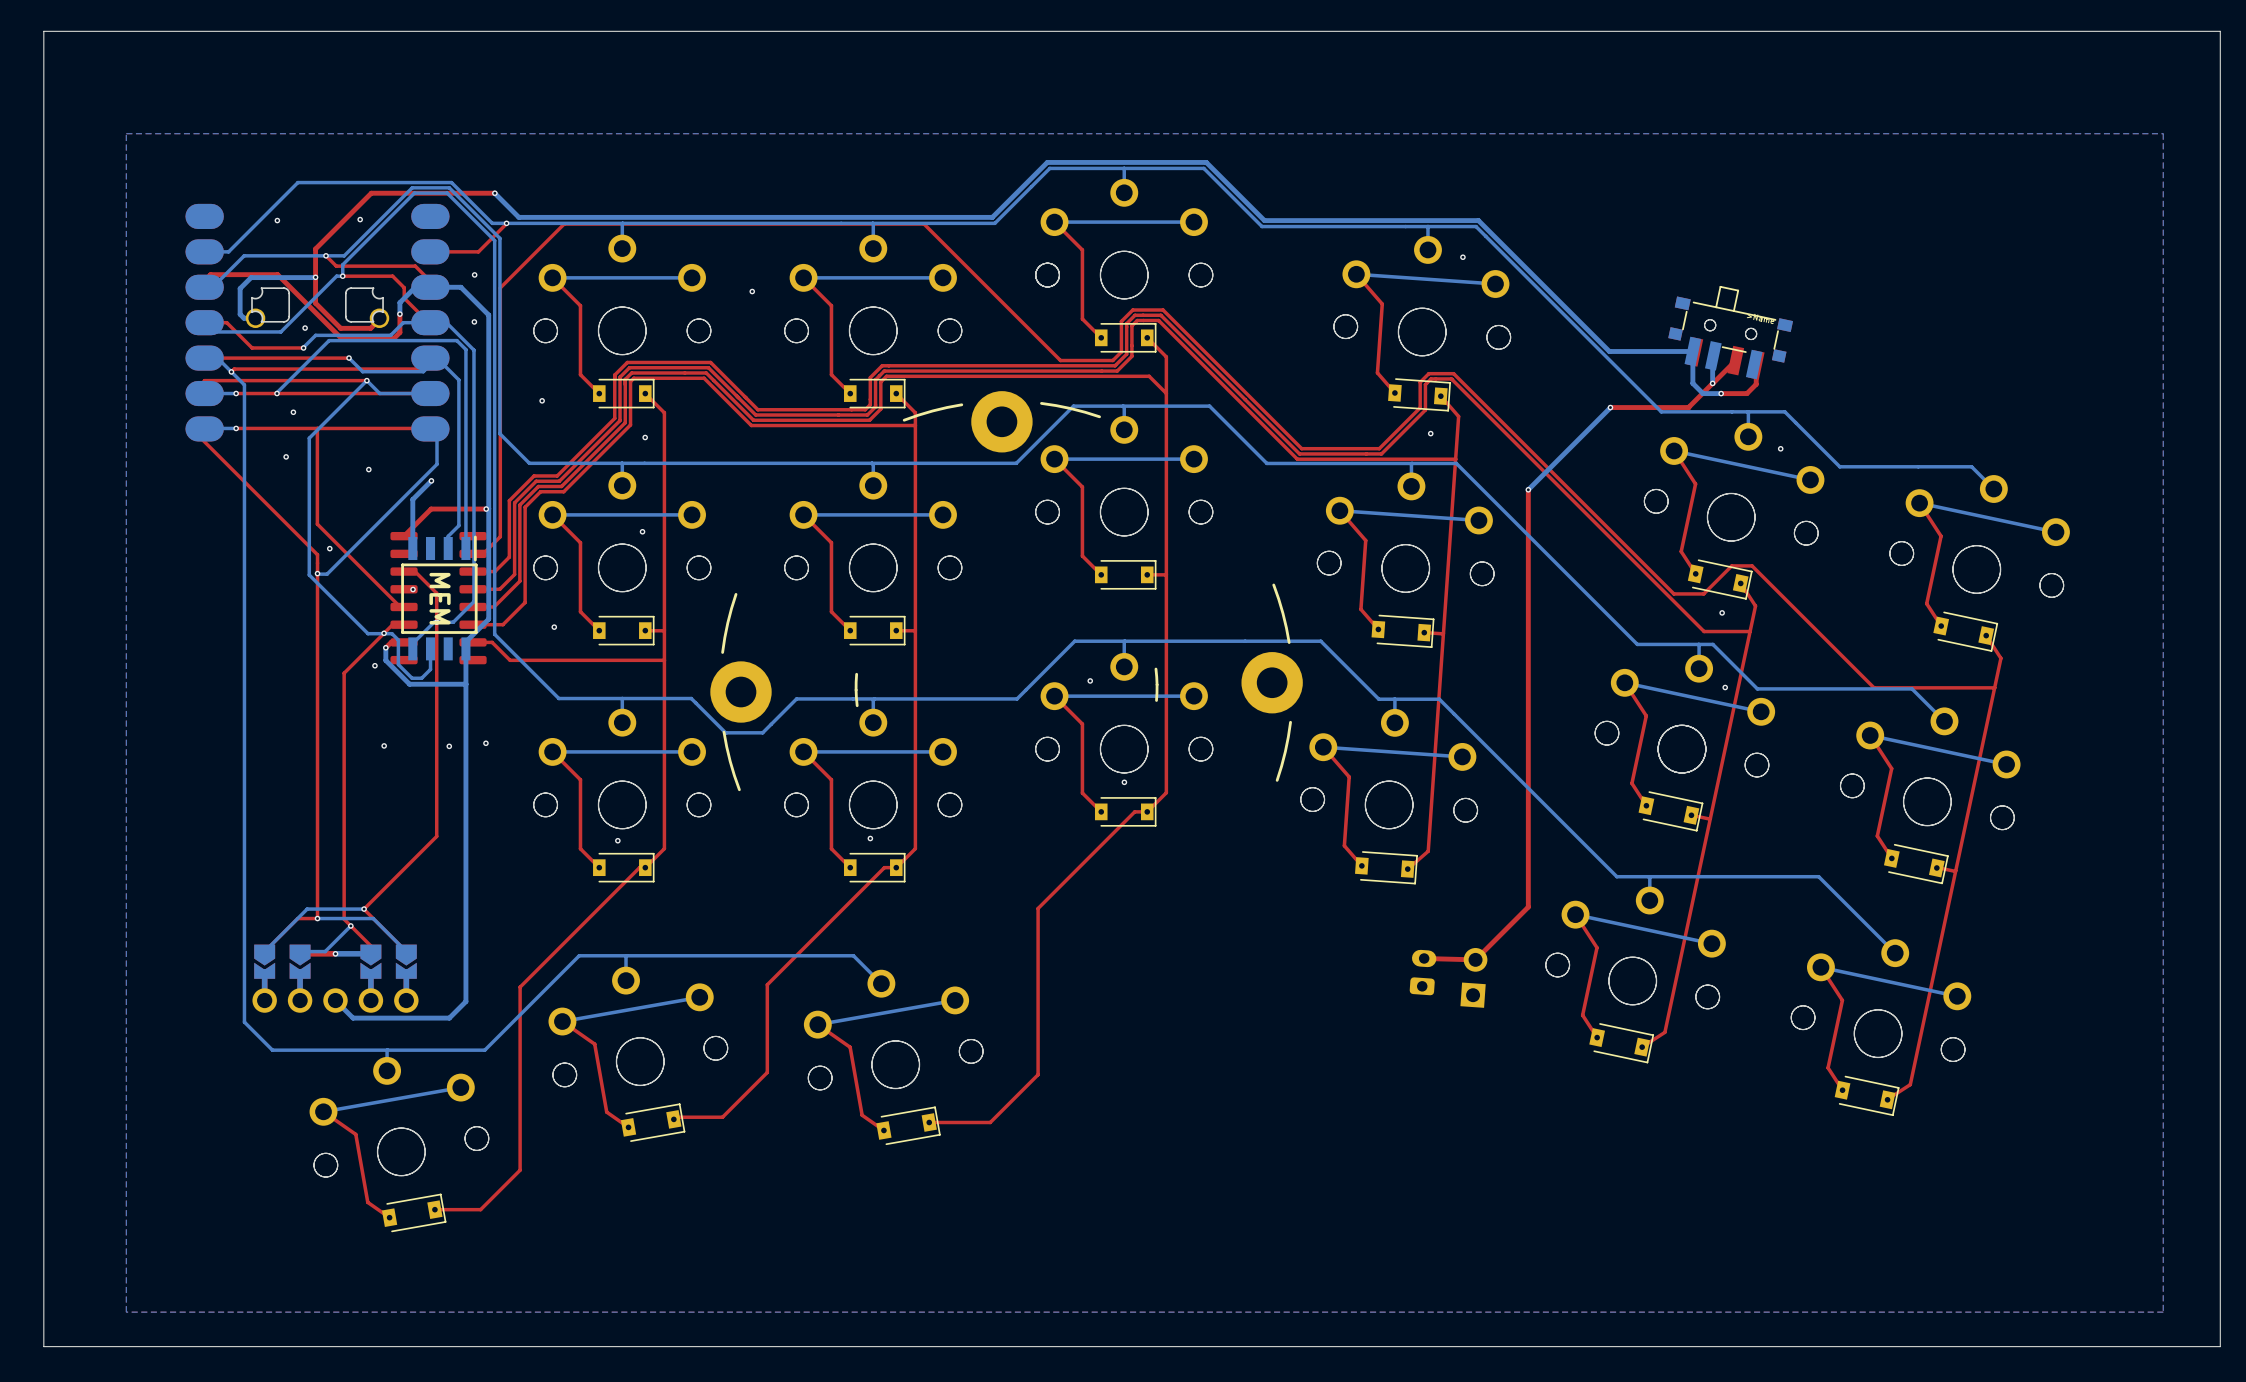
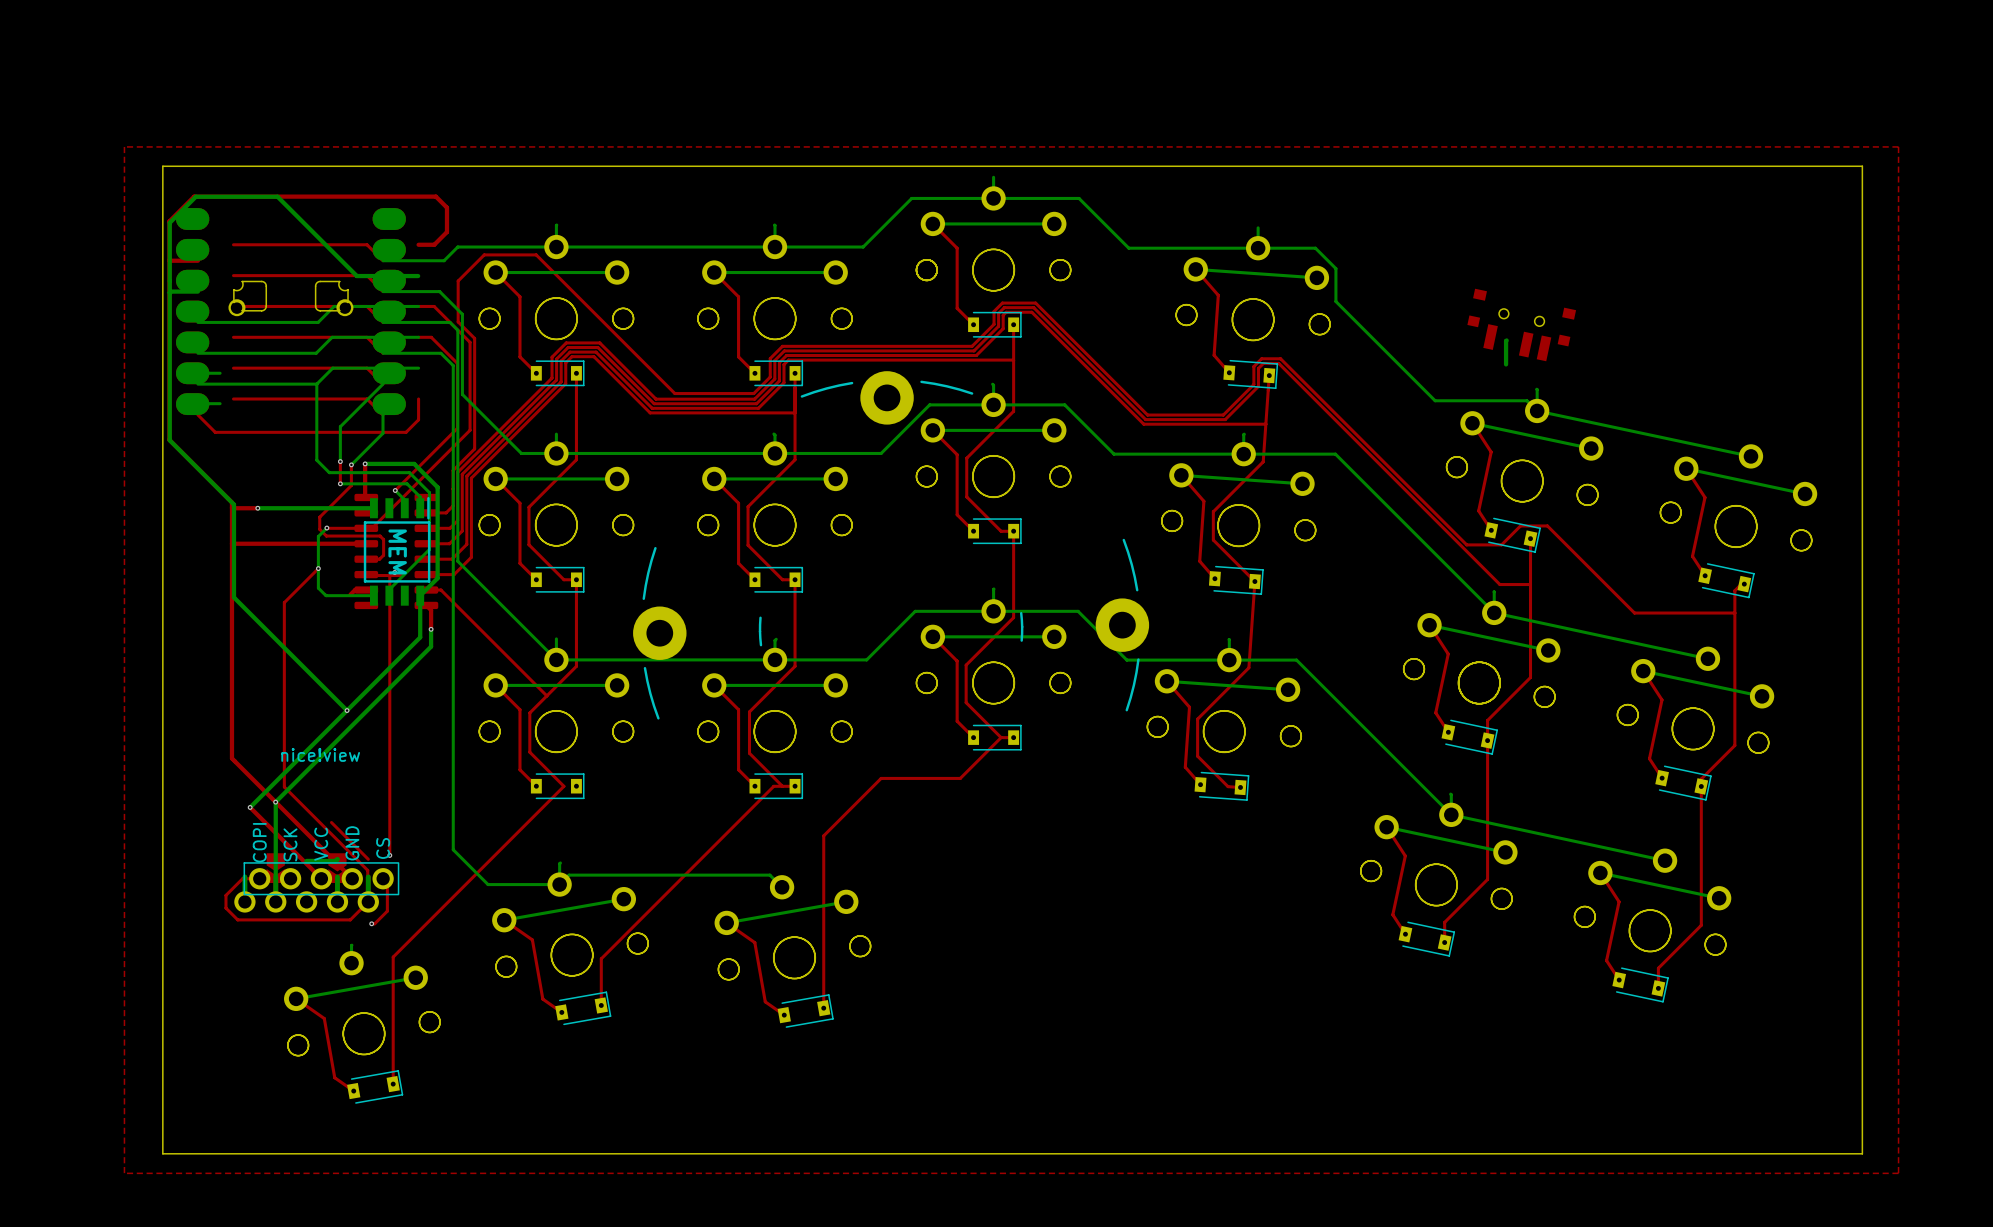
board edge: (2220, 31) (43, 31) (43, 1346) (2220, 1346) (2220, 31) -> (1862, 166) (1862, 1153) (162, 1153) (162, 166) (1862, 166)
bottom zone outline: (2163, 133) (126, 133) (126, 1312) (2163, 1312) (2163, 133) -> none
top track: (494, 193) (371, 193) (315, 249) (315, 303) (340, 328) (370, 328) (379, 318) -> none
bottom track: (494, 193) (518, 217) (992, 217) (1047, 162) (1206, 162) (1264, 220) (1478, 220) (1609, 351) (1692, 351) (1692, 383) (1703, 393) (1721, 393) -> none
via: (494, 193) -> none
via: (360, 219) -> none
via: (277, 220) -> none
via: (506, 223) -> none
top track: (507, 223) (478, 251) (437, 251) -> none
top track: none -> (233, 244) (367, 244) (382, 260)
top track: none -> (418, 244) (434, 244) (446, 232) (446, 207) (435, 196) (194, 196) (169, 221) (169, 439) (231, 502) (231, 758) (352, 878)
bottom track: (198, 251) (228, 251) (297, 182) (451, 182) (492, 223) (994, 223) (1049, 168) (1203, 168) (1262, 226) (1476, 226) (1661, 411) (1784, 411) (1839, 466) (1971, 466) (1993, 489) -> (382, 260) (444, 260) (457, 247) (863, 247) (911, 198) (1079, 198) (1128, 248) (1315, 248) (1335, 268) (1335, 301) (1435, 400) (1526, 400) (1537, 410) (1750, 456)
top track: (326, 255) (336, 266) (415, 266) (437, 287) -> none
via: (326, 255) -> none
via: (1462, 257) -> none
top track: none -> (169, 260) (197, 260)
via: (474, 274) -> none
via: (342, 276) -> none
top track: (344, 276) (392, 276) (404, 287) (404, 298) (428, 322) (437, 322) -> none
bottom track: (315, 277) (251, 277) (240, 288) (240, 314) (244, 318) (255, 318) -> none
via: (315, 277) -> none
top track: none -> (233, 275) (367, 275) (382, 291)
bottom track: none -> (418, 276) (356, 276) (277, 196) (195, 196) (169, 222) (169, 440) (233, 504) (233, 597) (347, 710)
top track: (198, 287) (210, 274) (277, 274) (341, 338) (393, 338) (399, 332) (399, 314) -> none
bottom track: (198, 287) (212, 287) (244, 255) (344, 255) (412, 187) (449, 187) (499, 238) (499, 433) (529, 463) (1016, 463) (1073, 406) (1209, 406) (1266, 463) (1456, 463) (1637, 644) (1712, 644) (1757, 688) (1912, 688) (1944, 721) -> (382, 291) (439, 291) (462, 314) (462, 394) (521, 453) (881, 453) (929, 404) (1064, 404) (1114, 454) (1335, 454) (1494, 612) (1707, 658)
via: (752, 291) -> none
bottom track: none -> (197, 291) (169, 292)
bottom track: (399, 314) (399, 302) (415, 287) (460, 287) (488, 315) (488, 619) (465, 641) (465, 648) -> (365, 463) (414, 463) (437, 487) (437, 578) (420, 595)
via: (399, 314) -> none
top track: none -> (233, 306) (367, 306) (382, 322)
bottom track: none -> (418, 306) (334, 306) (318, 322) (197, 322)
via: (474, 321) -> none
top track: (198, 322) (226, 322) (252, 347) (303, 347) -> none
bottom track: (198, 322) (207, 331) (280, 331) (336, 276) (342, 276) (342, 264) (414, 193) (447, 193) (494, 240) (494, 634) (558, 698) (691, 698) (725, 732) (762, 732) (796, 698) (1017, 698) (1074, 641) (1320, 641) (1378, 699) (1439, 699) (1616, 876) (1818, 876) (1895, 953) -> (382, 322) (450, 322) (457, 330) (457, 561) (556, 659) (866, 659) (915, 611) (1078, 611) (1126, 660) (1296, 660) (1451, 814) (1665, 860)
via: (305, 328) -> none
part: (1730, 332) -> none
top track: (1147, 337) (1166, 356) (1166, 792) (1147, 811) -> (1013, 324) (1013, 411) (966, 458) (966, 496) (1001, 531) (1013, 531)
bottom track: (303, 347) (315, 335) (390, 335) (403, 322) (446, 322) (473, 350) (473, 601) (453, 622) (434, 622) (412, 643) (412, 648) -> (325, 595) (373, 595)
via: (303, 347) -> none
top track: none -> (233, 337) (367, 337) (382, 353)
top track: none -> (418, 337) (431, 337) (457, 363) (457, 428) (395, 490)
bottom track: none -> (418, 337) (332, 337) (316, 353) (197, 353)
bottom track: (198, 358) (217, 358) (244, 384) (244, 1022) (272, 1050) (484, 1050) (579, 955) (853, 955) (867, 969) -> (382, 353) (440, 353) (453, 365) (453, 849) (488, 884) (559, 884) (569, 875) (769, 875)
top track: (348, 358) (198, 358) -> none
bottom track: (349, 358) (362, 371) (423, 371) (437, 358) (458, 379) (458, 525) (448, 536) (448, 539) -> (395, 490) (404, 500)
via: (349, 358) -> none
top track: (437, 358) (426, 369) (234, 369) (231, 371) -> none
top track: (1735, 360) (1688, 407) (1610, 407) -> none
top track: (1756, 364) (1756, 384) (1746, 393) (1721, 393) -> none
via: (231, 371) -> none
top track: (366, 380) (204, 380) (198, 387) (198, 393) -> none
via: (366, 380) -> none
via: (1712, 383) -> none
top track: none -> (233, 368) (367, 368) (382, 384)
bottom track: none -> (418, 368) (332, 368) (316, 384)
via: (236, 393) -> none
bottom track: (276, 393) (329, 340) (456, 340) (465, 349) (465, 535) -> (340, 483) (407, 483) (420, 497)
via: (277, 393) -> none
top track: (437, 393) (236, 393) -> none
bottom track: (437, 393) (379, 393) (366, 380) (309, 438) (309, 574) (367, 633) (391, 633) (398, 640) (398, 664) (412, 678) (421, 678) (430, 669) (430, 648) -> (316, 384) (316, 460) (329, 472) (409, 472) (429, 492) (429, 549) (389, 589) (389, 595)
top track: (645, 393) (664, 412) (664, 848) (645, 867) -> (576, 373) (576, 459) (528, 507) (528, 544) (563, 579) (576, 579)
top track: (896, 393) (915, 412) (915, 848) (896, 867) -> (795, 373) (795, 459) (748, 506) (748, 545) (782, 579) (795, 579)
top track: (1166, 393) (1149, 376) (886, 376) (880, 382) (880, 409) (869, 420) (753, 420) (706, 372) (631, 372) (625, 379) (625, 422) (561, 486) (538, 486) (519, 505) (519, 581) (494, 606) -> (1013, 360) (788, 360) (783, 364) (783, 382) (758, 408) (652, 408) (596, 352) (570, 352) (561, 360) (561, 381) (466, 476) (466, 544) (452, 559) (444, 559)
via: (1721, 393) -> none
top track: (1440, 396) (1458, 416) (1428, 851) (1407, 869) -> (1269, 375) (1263, 461) (1213, 511) (1213, 540) (1254, 581)
via: (542, 400) -> none
bottom track: none -> (316, 384) (197, 384)
bottom track: none -> (382, 384) (340, 426) (340, 461)
bottom track: (1610, 407) (1528, 489) -> none
via: (1610, 407) -> none
via: (293, 412) -> none
top track: none -> (233, 399) (367, 399) (382, 414)
top track: none -> (418, 399) (418, 419) (406, 432) (215, 432) (197, 414)
top track: (915, 425) (751, 425) (704, 378) (633, 378) (630, 381) (630, 424) (563, 491) (540, 491) (525, 507) (525, 602) (502, 624) -> (794, 412) (650, 412) (593, 356) (571, 356) (565, 362) (565, 383) (471, 478) (471, 557) (452, 574)
top track: (213, 428) (198, 428) (198, 435) (317, 554) (317, 918) (297, 918) (264, 951) -> none
via: (236, 428) -> none
top track: (317, 428) (317, 524) (400, 606) (404, 606) -> (351, 464) (351, 485) (319, 517) (319, 529) (326, 536) (380, 536) (383, 539) (383, 555) (379, 559) (366, 559)
top track: (435, 428) (235, 428) -> none
bottom track: (437, 428) (437, 464) (327, 574) (317, 574) -> none
via: (1430, 433) -> none
via: (645, 437) -> none
bottom track: none -> (382, 414) (382, 433) (351, 464)
via: (1780, 448) -> none
via: (286, 456) -> none
top track: (1455, 459) (1297, 459) (1158, 320) (1137, 320) (1131, 325) (1131, 356) (1117, 371) (884, 371) (875, 379) (875, 406) (867, 415) (755, 415) (708, 367) (629, 367) (620, 377) (620, 420) (559, 481) (536, 481) (514, 502) (514, 574) (499, 589) -> (1265, 424) (1143, 424) (1031, 312) (1006, 312) (1003, 315) (1003, 328) (976, 355) (786, 355) (779, 362) (779, 380) (756, 403) (654, 403) (597, 347) (568, 347) (556, 359) (556, 379) (462, 474) (462, 531) (449, 543)
via: (368, 469) -> none
bottom track: (431, 480) (412, 499) (412, 548) -> (257, 508) (373, 508)
via: (431, 480) -> none
top track: (1528, 489) (1528, 907) (1475, 959) (1424, 958) -> none
via: (1528, 489) -> none
top track: none -> (340, 461) (340, 483)
via: none -> (340, 461)
via: none -> (365, 463)
via: none -> (351, 464)
top track: (486, 509) (431, 509) (404, 536) -> (365, 463) (366, 497)
via: (486, 509) -> none
via: none -> (340, 483)
via: none -> (395, 490)
via: (642, 531) -> none
top track: none -> (231, 507) (257, 508)
via: none -> (257, 508)
via: (329, 548) -> none
top track: (483, 553) (500, 536) (500, 287) (564, 224) (924, 224) (1060, 360) (1112, 360) (1121, 352) (1121, 321) (1132, 310) (1163, 310) (1301, 448) (1379, 448) (1420, 407) (1420, 382) (1428, 373) (1453, 373) (1673, 593) (1703, 593) (1731, 565) (1752, 565) (1874, 687) (1994, 687) -> (435, 512) (446, 512) (453, 505) (453, 470) (474, 448) (474, 338) (458, 321) (458, 281) (484, 254) (536, 254) (674, 393) (753, 393) (770, 377) (770, 358) (782, 346) (972, 346) (994, 324) (994, 311) (1002, 303) (1035, 303) (1147, 415) (1223, 415) (1253, 384) (1253, 366) (1261, 358) (1280, 358) (1466, 544) (1501, 544) (1520, 525) (1547, 525) (1634, 613) (1734, 613)
top track: none -> (326, 528) (366, 528)
bottom track: none -> (326, 528) (318, 536) (318, 588) (325, 595)
via: none -> (326, 528)
top track: (410, 571) (415, 571) (436, 593) (436, 836) (364, 909) -> (372, 528) (470, 430) (470, 342) (434, 306) (418, 306)
top track: (494, 571) (509, 557) (509, 500) (534, 475) (557, 475) (614, 418) (614, 375) (627, 362) (710, 362) (757, 409) (865, 409) (870, 404) (870, 377) (882, 365) (1115, 365) (1126, 354) (1126, 323) (1135, 315) (1160, 315) (1299, 453) (1381, 453) (1425, 410) (1425, 384) (1431, 378) (1451, 378) (1704, 631) (1750, 631) -> (445, 528) (449, 528) (457, 520) (457, 472) (552, 378) (552, 357) (566, 342) (599, 342) (656, 399) (754, 399) (774, 378) (774, 360) (784, 350) (973, 350) (998, 326) (998, 313) (1004, 307) (1033, 307) (1145, 419) (1225, 419) (1258, 386) (1258, 368) (1263, 363) (1278, 363) (1499, 584) (1530, 584)
via: (317, 573) -> none
top track: (1166, 574) (1147, 574) -> none
top track: (1740, 583) (1755, 606) (1664, 1032) (1642, 1047) -> (1530, 538) (1530, 677) (1487, 720) (1487, 879) (1444, 922) (1444, 942)
top track: none -> (366, 543) (231, 543)
via: (413, 589) -> none
via: (1722, 612) -> none
top track: none -> (318, 568) (284, 602) (284, 787) (367, 870) (368, 901) (350, 919) (237, 919) (225, 908) (225, 895) (242, 878) (259, 878)
via: none -> (318, 568)
top track: (404, 624) (392, 624) (344, 673) (344, 919) (370, 946) (370, 951) -> (366, 574) (403, 575)
top track: none -> (389, 575) (389, 855)
via: (554, 627) -> none
top track: (663, 630) (645, 630) -> none
top track: (914, 630) (896, 630) -> (782, 786) (749, 753) (749, 711) (795, 666) (795, 579)
top track: (1424, 632) (1442, 633) -> (1254, 581) (1248, 667) (1197, 719) (1197, 756) (1228, 786) (1240, 787)
via: (384, 633) -> none
top track: (1986, 635) (2000, 658) (1910, 1084) (1887, 1099) -> (1744, 584) (1741, 584) (1734, 590) (1734, 745) (1701, 779) (1701, 925) (1658, 968) (1658, 988)
top track: (489, 642) (492, 642) (510, 660) (664, 660) -> (440, 590) (546, 695)
bottom track: (385, 647) (385, 660) (409, 684) (465, 684) -> none
via: (385, 647) -> none
top track: none -> (426, 605) (431, 610) (431, 629)
via: (374, 665) -> none
via: (1090, 680) -> none
bottom track: none -> (431, 629) (431, 646) (275, 802)
via: none -> (431, 629)
via: (1725, 687) -> none
bottom track: (465, 696) (465, 1001) (449, 1018) (353, 1018) (335, 1000) -> (420, 637) (250, 807)
via: (485, 743) -> none
via position: (384, 745) -> (347, 710)
via: (449, 746) -> none
via: (1124, 782) -> none
top track: (1134, 811) (1038, 908) (1038, 1074) (990, 1122) (929, 1122) -> (1013, 531) (1013, 617) (966, 665) (966, 702) (1001, 737) (960, 778) (881, 778) (823, 835) (823, 1008)
top track: (1691, 815) (1709, 819) -> none
via: (870, 838) -> none
via: (617, 840) -> none
top track: (645, 867) (639, 867) (520, 987) (520, 1170) (480, 1209) (434, 1209) -> (576, 579) (576, 666) (529, 712) (529, 752) (563, 786) (393, 957) (393, 1084)
top track: (896, 867) (884, 867) (767, 984) (767, 1072) (722, 1117) (676, 1117) (673, 1119) -> (795, 786) (773, 786) (601, 958) (601, 1005)
top track: (1936, 867) (1954, 871) -> none
via: none -> (275, 802)
bottom track: none -> (275, 802) (275, 876)
top track: none -> (250, 807) (321, 878)
via: none -> (250, 807)
bottom track: (364, 909) (307, 909) (264, 951) -> none
via: (364, 909) -> none
bottom track: (317, 918) (373, 918) (406, 951) -> none
via: (317, 918) -> none
bottom track: (350, 925) (325, 951) (300, 951) -> none
via: (350, 925) -> none
via: none -> (389, 855)
top track: (300, 951) (302, 953) (335, 953) -> none
via: (335, 953) -> none
part: (264, 961) -> none
part: (300, 961) -> none
part: (370, 961) -> none
part: (406, 961) -> none
part: (1423, 972) -> none
part: none -> nice!view (321, 878)
top track: none -> (383, 878) (387, 882) (387, 911) (374, 923) (371, 923)
part: (1473, 977) -> none
via: none -> (371, 923)

